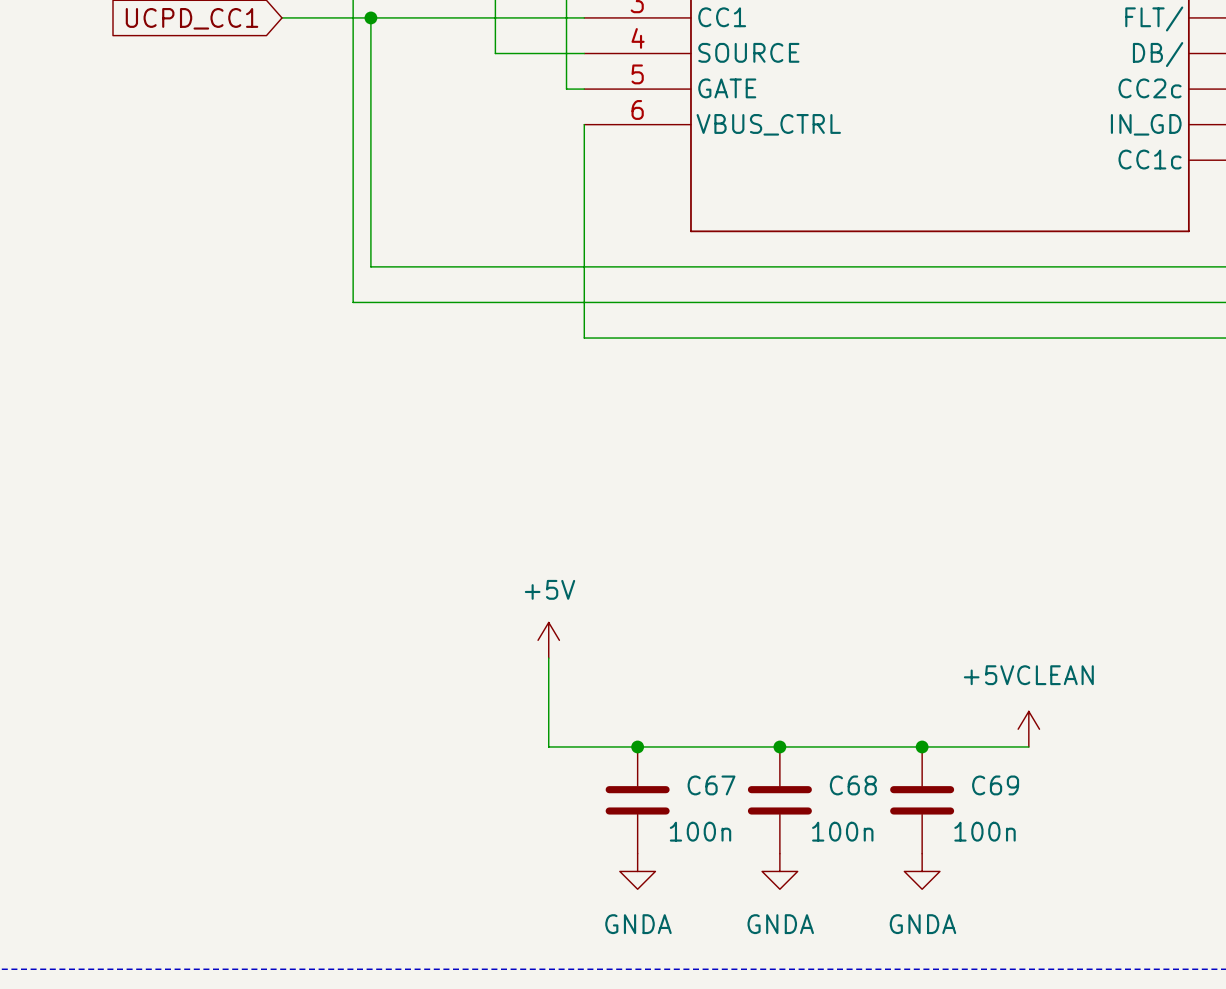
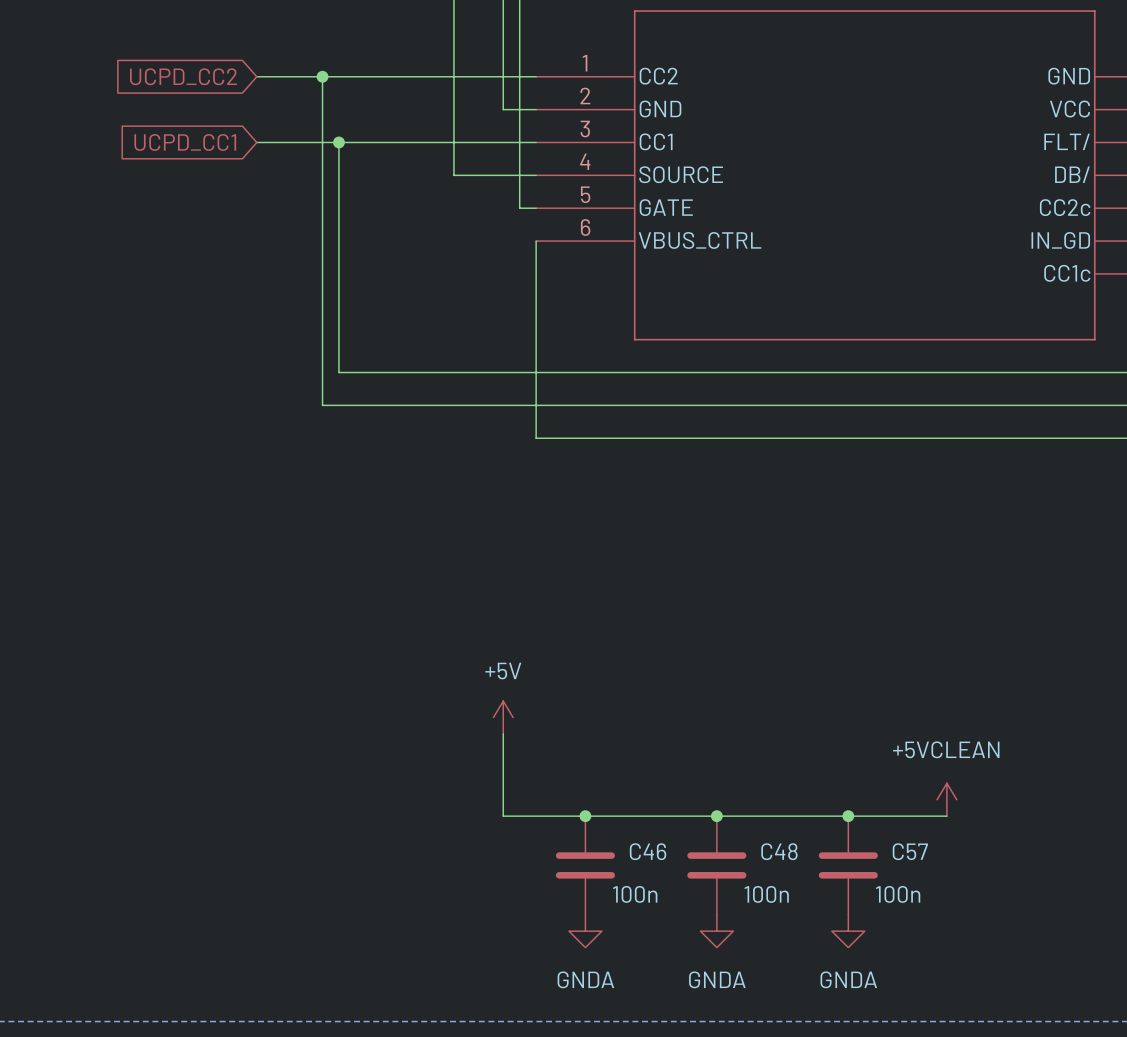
C67 name: C67 (711, 785) -> C46 (648, 851)
C68 name: C68 (853, 785) -> C48 (779, 851)
C69 name: C69 (995, 785) -> C57 (910, 851)

